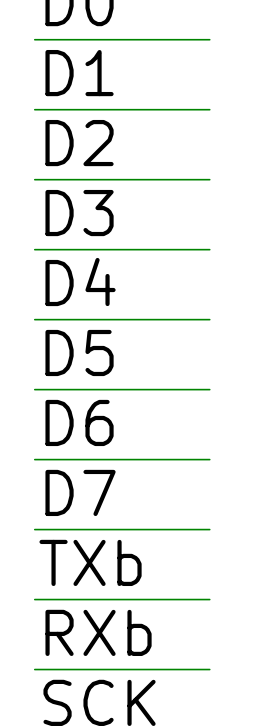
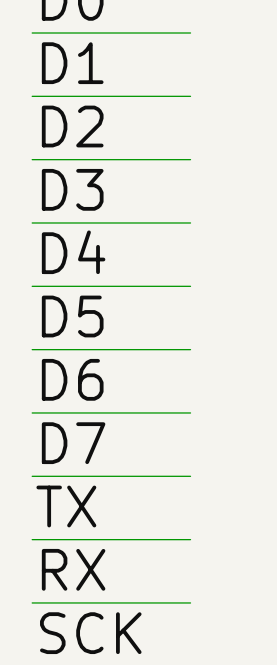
label: TXb (90, 562) -> TX (66, 506)
label: RXb (98, 632) -> RX (73, 569)

